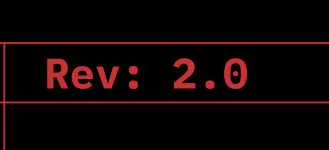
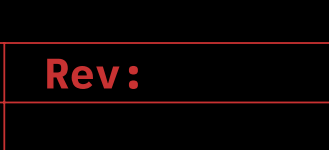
title block: Rev: 2.0 (147, 73) -> Rev: (92, 73)

